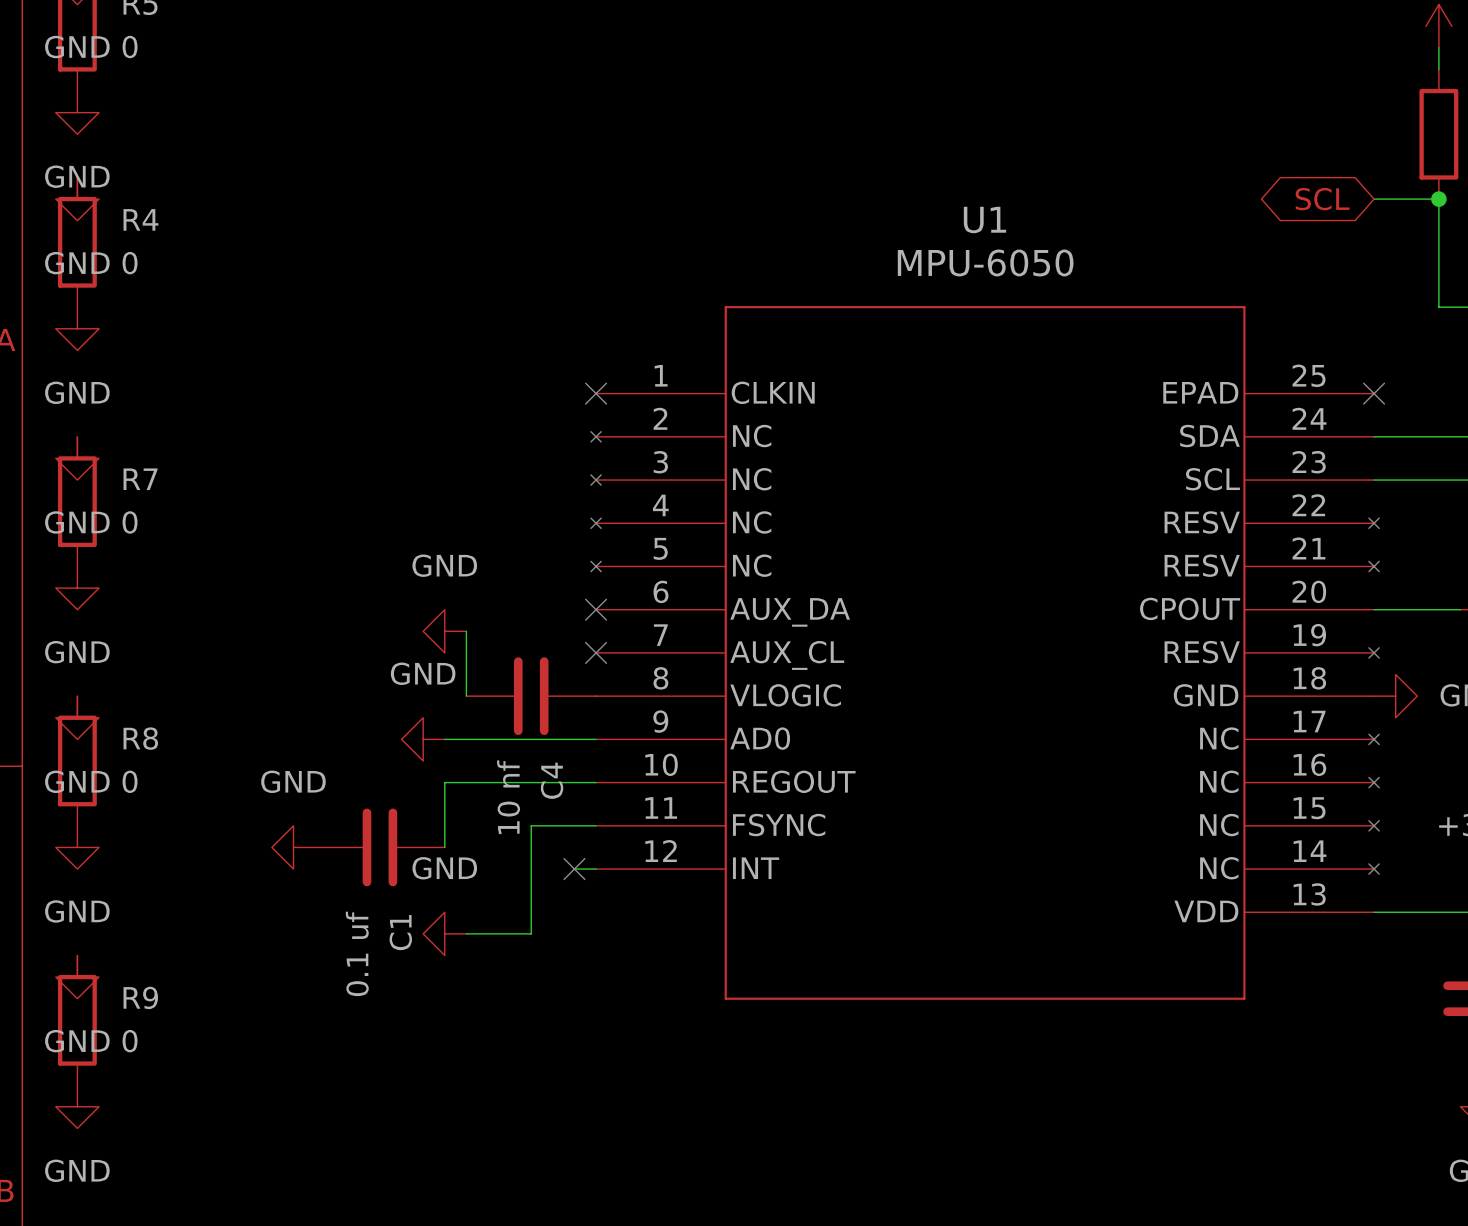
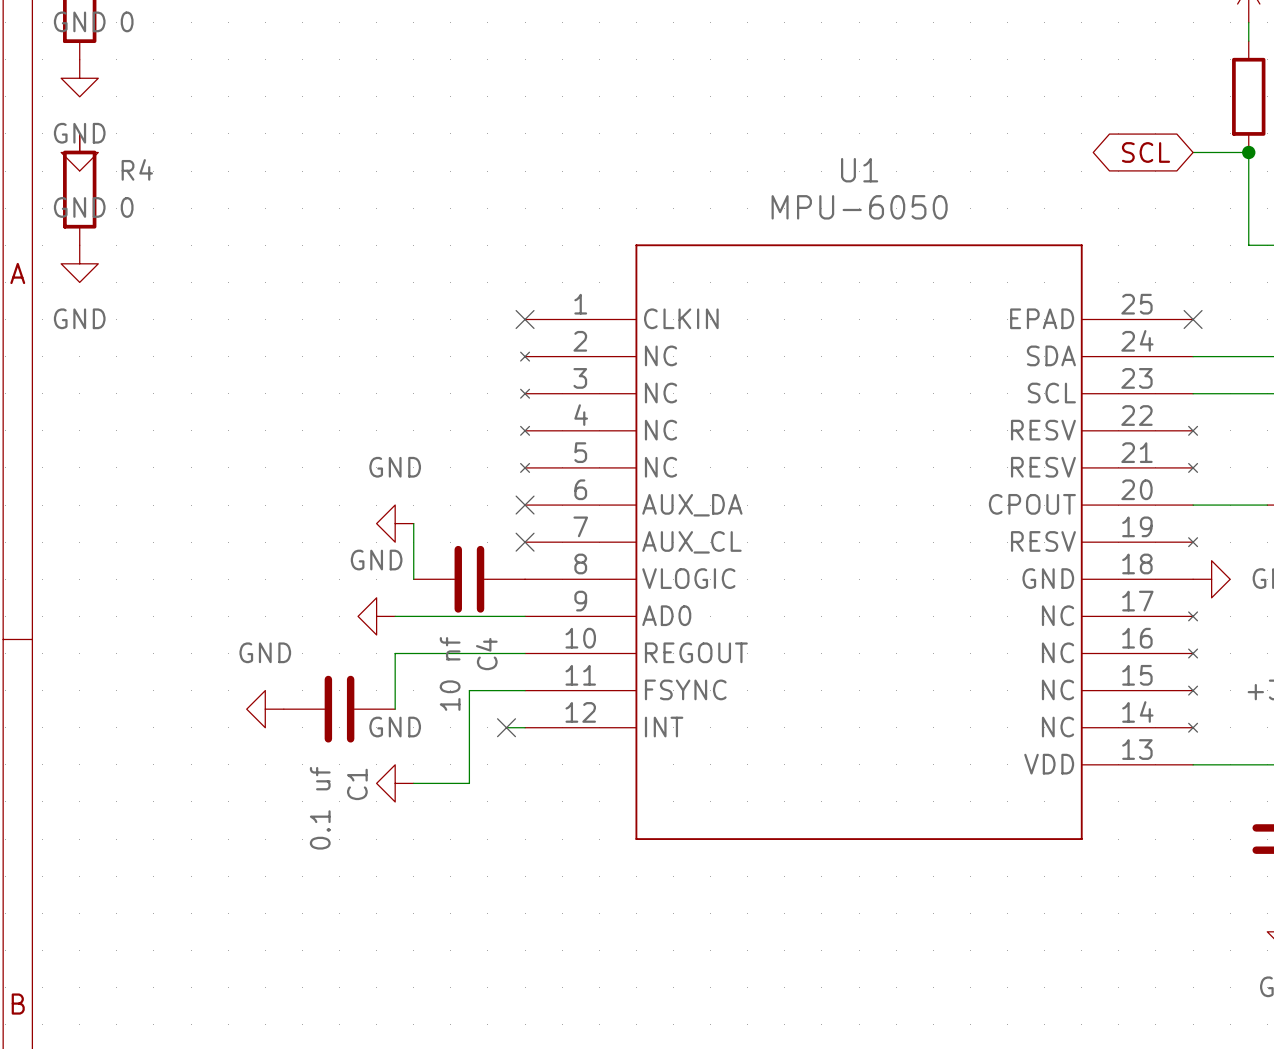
power symbol: GND (77, 458) -> none
R7: 0 (77, 501) -> none
power symbol: GND (77, 588) -> none
power symbol: GND (77, 717) -> none
R8: 0 (77, 760) -> none
power symbol: GND (77, 847) -> none
power symbol: GND (77, 977) -> none
R9: 0 (77, 1020) -> none
power symbol: GND (77, 1106) -> none

